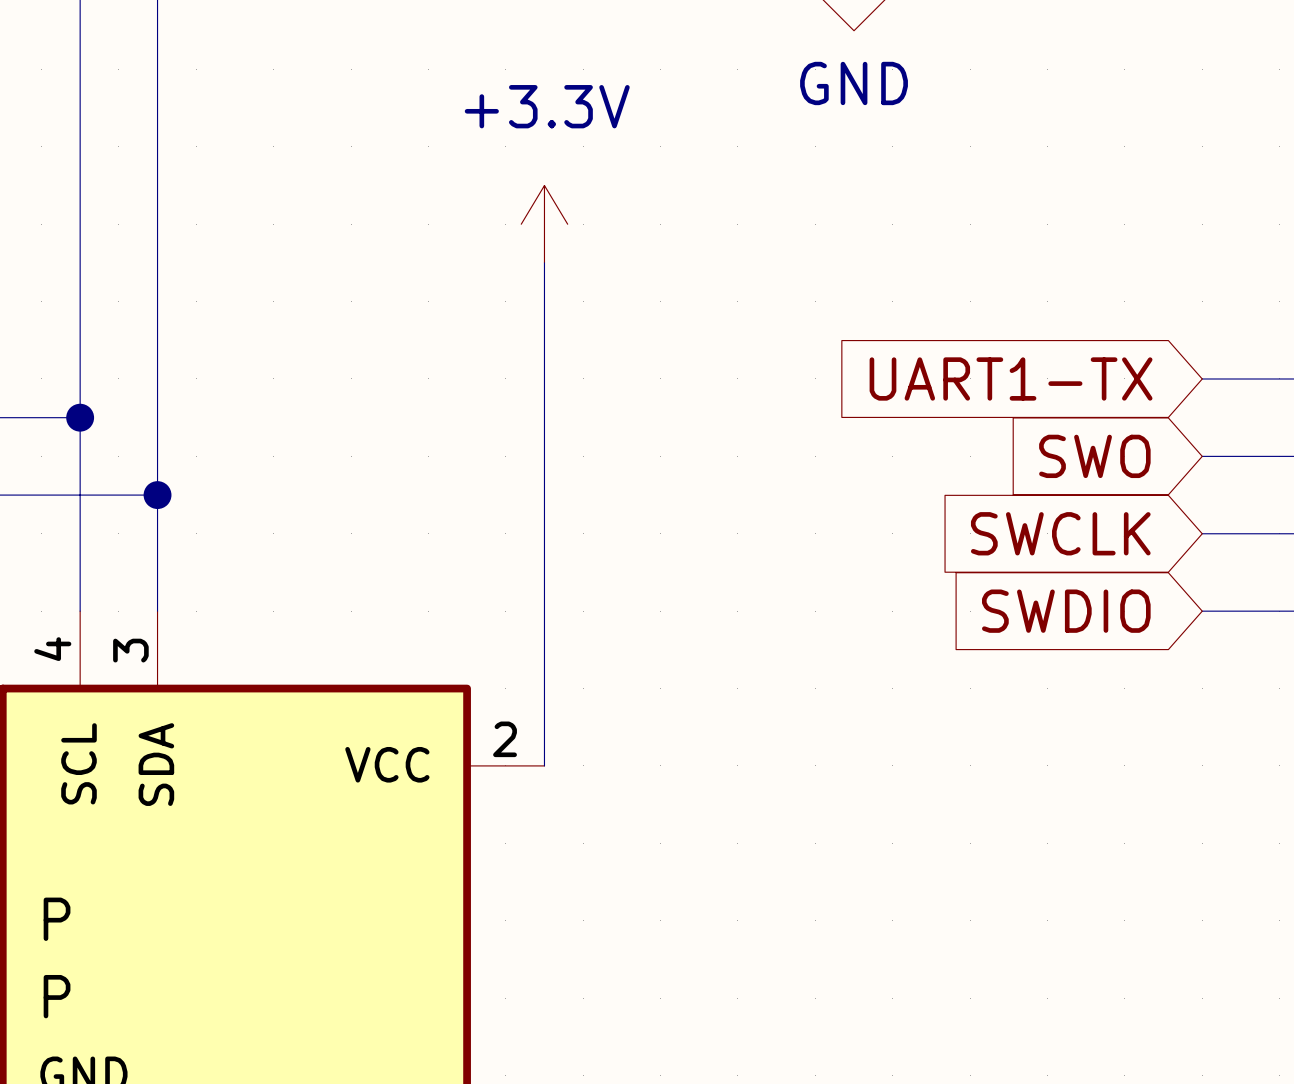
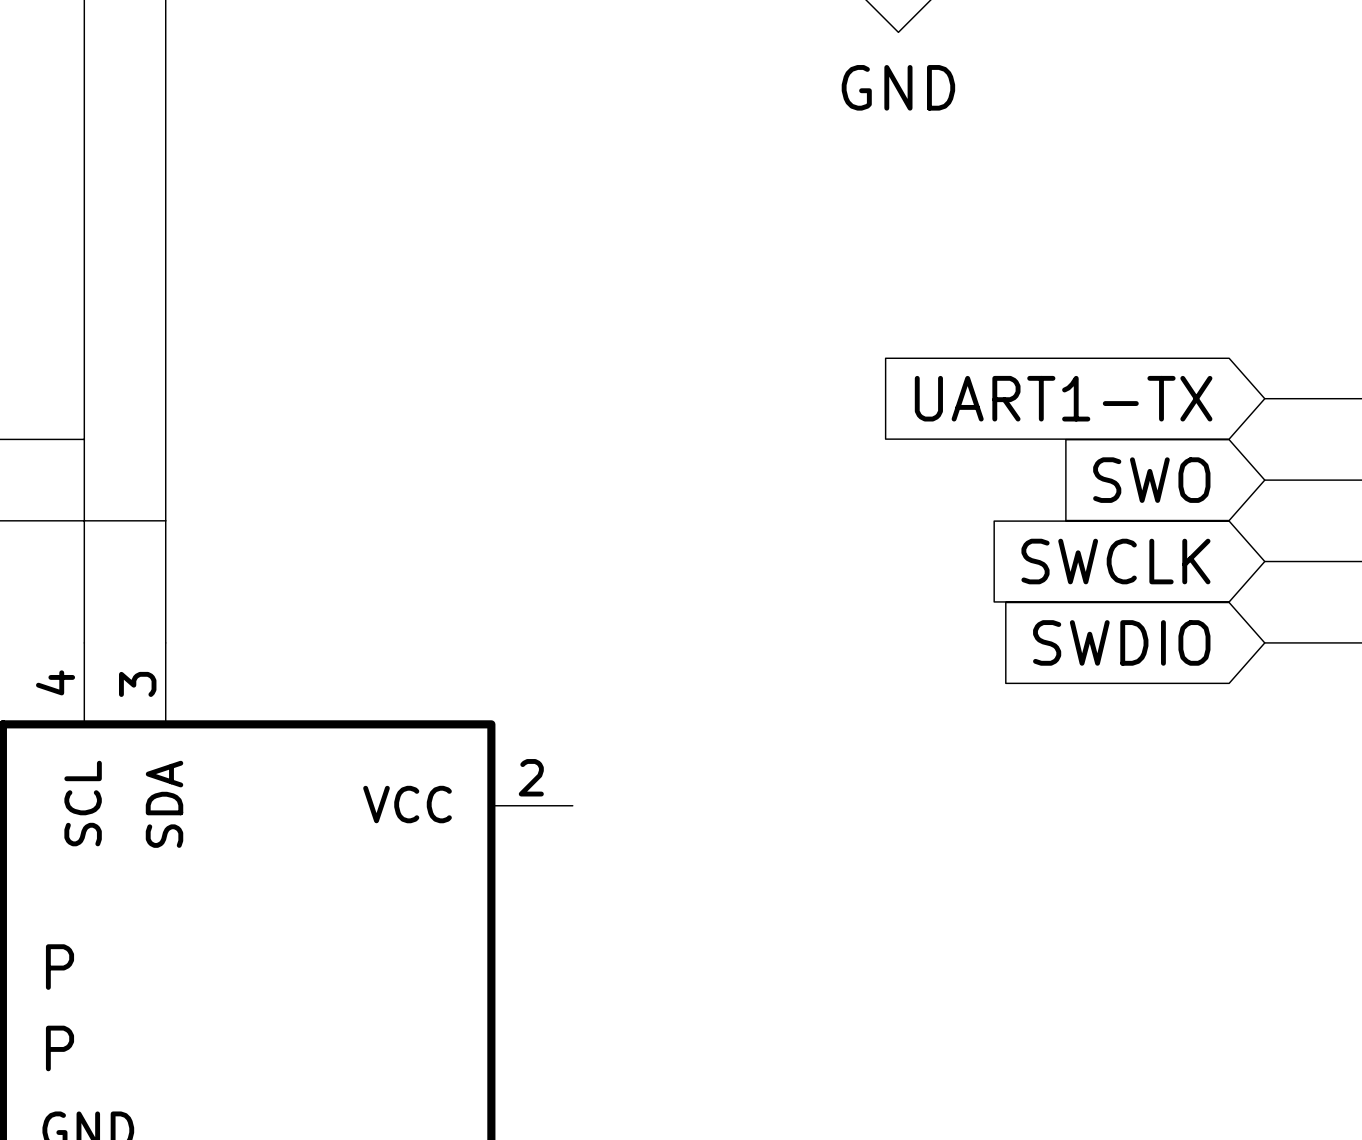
power symbol: +3.3V (544, 224) -> none
wire: (544, 262) (544, 765) -> none
junction: (80, 417) -> none
junction: (157, 495) -> none

